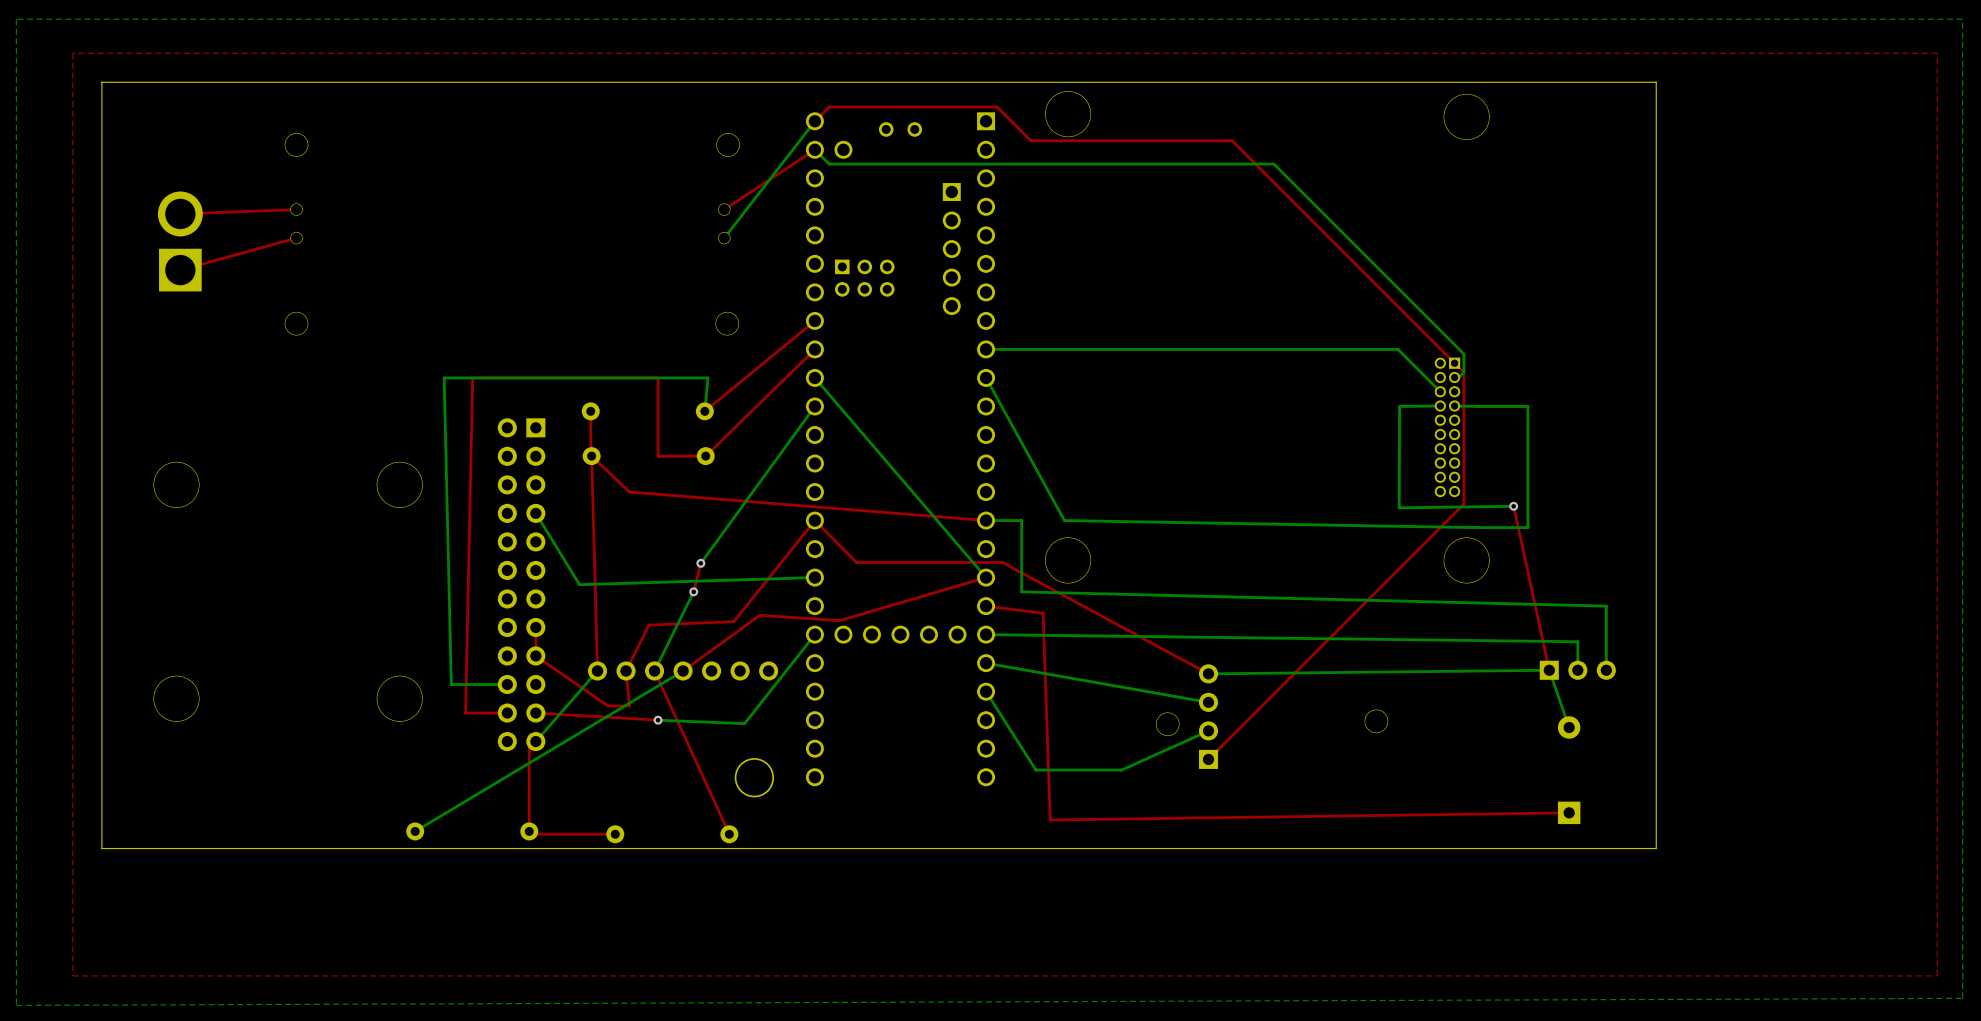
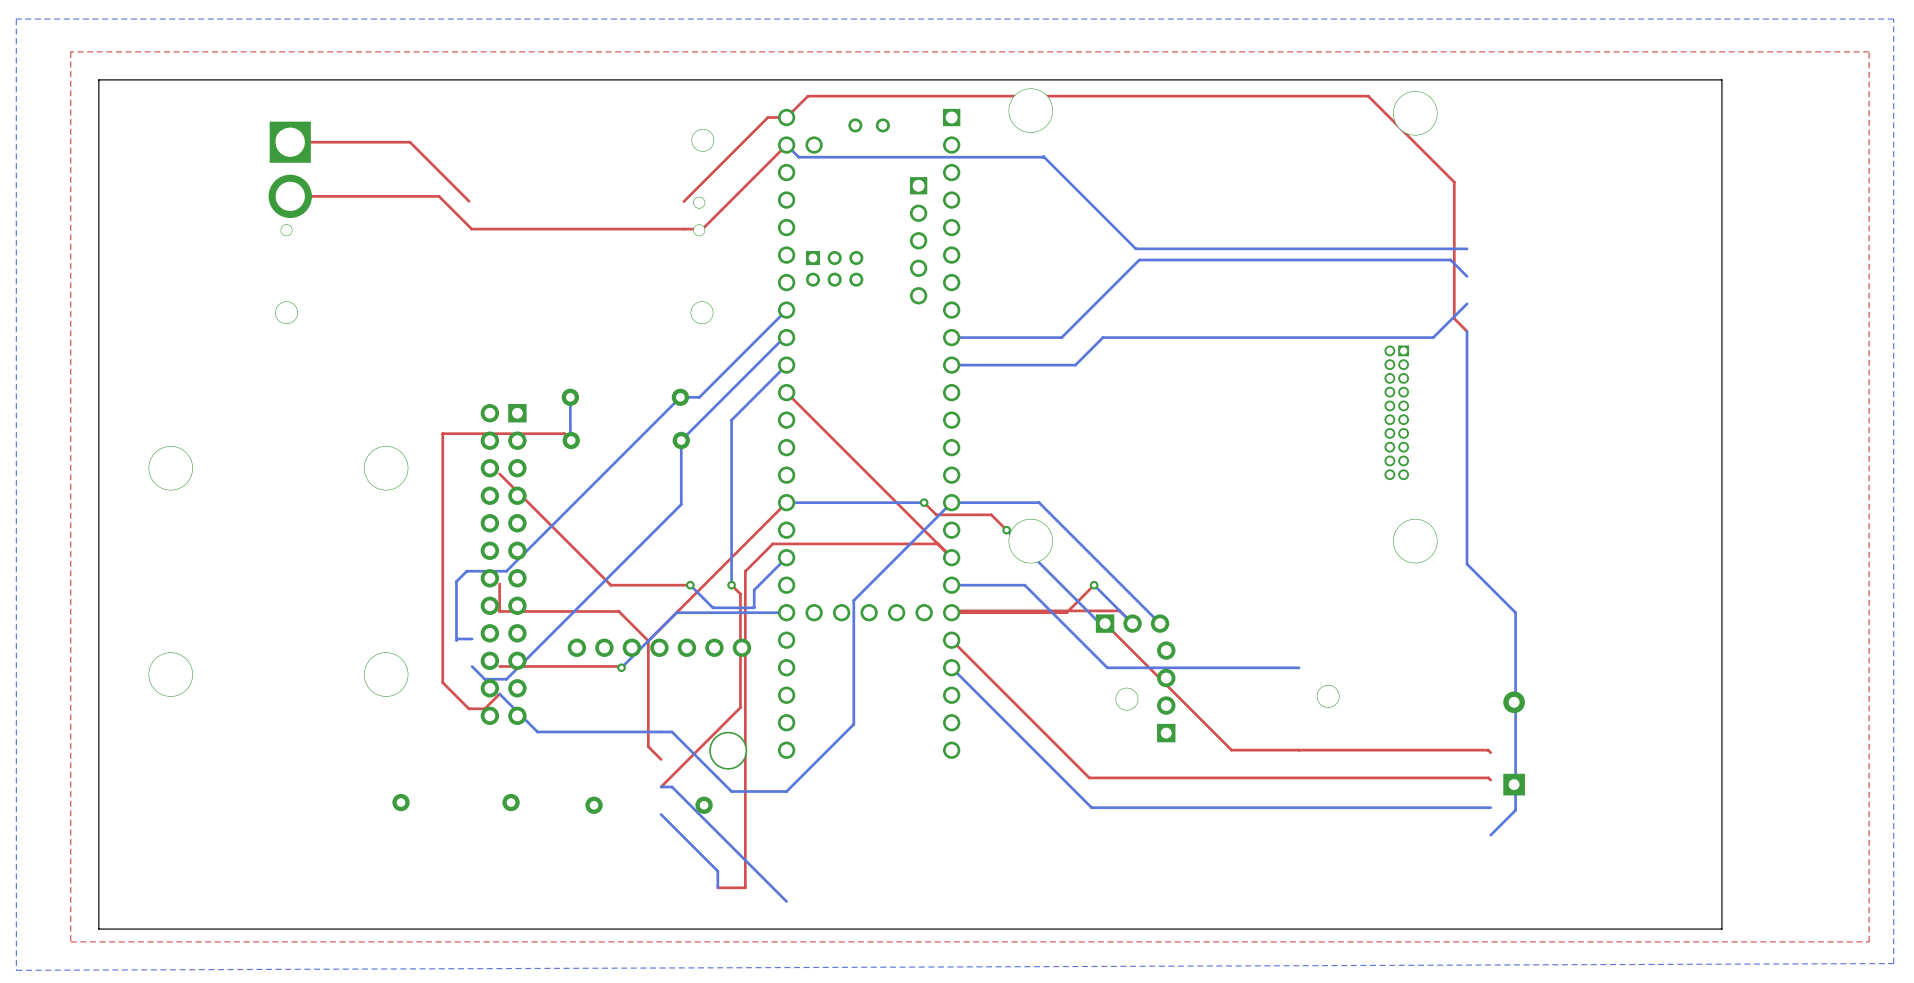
board edge: (1656, 82) (1656, 848) (101, 848) -> (1598, 79) (1721, 79) (1721, 929) (98, 929) (98, 819)
top track: (829, 107) (997, 107) (1030, 140) (1232, 140) (1463, 372) (1463, 504) (1208, 759) -> (800, 103) (807, 96) (1368, 96) (1454, 182) (1454, 318) (1467, 331)
top track: none -> (786, 117) (767, 117) (683, 201)
bottom track: (814, 121) (724, 238) -> none
top track: none -> (290, 142) (410, 142) (469, 201)
top track: (814, 149) (724, 209) -> (786, 145) (702, 229) (471, 229) (439, 196) (290, 196)
bottom track: (827, 162) (829, 164) (1273, 164) (1463, 353) (1463, 372) (1458, 377) (1454, 377) -> (798, 157) (1043, 156) (1135, 248) (1467, 248)
top track: (296, 209) (180, 213) -> none
top track: (296, 238) (180, 270) -> none
part rotation: 0° (180, 241) -> 180° (290, 169)
part position: (180, 241) -> (290, 169)
bottom track: none -> (1467, 276) (1450, 259) (1139, 259) (1061, 337)
top track: (814, 320) (704, 411) -> none
bottom track: none -> (786, 310) (699, 397) (680, 397) (506, 571) (466, 571) (456, 581) (456, 640) (472, 638)
bottom track: none -> (1467, 331) (1467, 564) (1515, 612) (1515, 810) (1490, 835)
top track: (814, 349) (705, 456) (658, 456) (658, 377) (472, 377) (465, 713) (507, 713) -> none
bottom track: none -> (786, 337) (784, 337) (681, 440) (681, 504) (506, 679) (484, 679) (472, 666)
bottom track: (1142, 349) (1100, 349) -> (1102, 337) (1075, 365) (951, 365)
bottom track: (1398, 349) (1440, 391) -> (1349, 337) (1433, 337) (1467, 303)
bottom track: (814, 377) (986, 577) -> (786, 365) (731, 420) (731, 585)
bottom track: (986, 377) (1064, 520) (1478, 527) -> none
bottom track: (1440, 405) (1399, 406) (1399, 507) (1513, 506) -> none
bottom track: (1454, 405) (1527, 406) (1527, 527) (1471, 527) -> none
bottom track: (814, 406) (700, 563) -> none
top track: (590, 411) (590, 455) -> (499, 694) (484, 708) (468, 708) (442, 682) (442, 433) (564, 433) (570, 439)
bottom track: none -> (570, 397) (571, 440)
bottom track: (704, 411) (707, 377) (444, 377) (451, 684) (507, 684) -> none
top track: none -> (499, 473) (610, 585) (690, 585)
top track: (1513, 506) (1549, 670) -> none
via: (1513, 506) -> none
bottom track: (535, 513) (579, 584) (814, 577) -> (690, 585) (712, 607) (754, 607) (754, 590) (786, 557)
top track: none -> (786, 502) (648, 640)
top track: none -> (924, 502) (936, 514) (991, 514) (1006, 530)
bottom track: none -> (924, 502) (786, 502)
via: none -> (924, 502)
top track: (986, 520) (629, 492) (591, 456) (597, 670) -> none
bottom track: none -> (951, 502) (853, 600) (853, 724) (786, 791) (731, 791) (672, 731) (537, 731) (499, 694)
bottom track: (1021, 520) (1021, 591) (1606, 606) (1606, 670) -> (986, 502) (1039, 502) (1160, 623)
bottom track: none -> (1006, 530) (1100, 623) (1105, 623)
via: none -> (1006, 530)
top track: (700, 563) (693, 591) -> none
via: (700, 563) -> none
top track: none -> (937, 543) (772, 543) (745, 571) (745, 887) (717, 887)
top track: (986, 577) (839, 620) (759, 615) (683, 670) -> (951, 557) (786, 392)
bottom track: (693, 591) (654, 670) -> none
via: (693, 591) -> none
top track: none -> (499, 583) (499, 611) (618, 611) (648, 640)
via: none -> (690, 585)
top track: none -> (731, 585) (740, 594) (740, 707) (661, 786)
via: none -> (731, 585)
top track: (986, 606) (1043, 613) (1050, 820) (1569, 812) -> none
bottom track: none -> (951, 585) (1024, 585) (1107, 667) (1299, 667)
top track: none -> (1094, 585) (1066, 612) (951, 612) (953, 610) (1119, 610) (1132, 623)
bottom track: none -> (1094, 585) (1132, 623)
via: none -> (1094, 585)
top track: (535, 627) (535, 655) (608, 705) (629, 705) (626, 670) (648, 625) (733, 621) (814, 520) (856, 562) (1002, 562) (1208, 673) -> none
bottom track: (814, 634) (744, 723) (658, 720) -> (786, 612) (676, 612) (621, 667)
bottom track: (986, 634) (1577, 641) (1577, 670) -> none
top track: none -> (1105, 623) (1231, 750) (1488, 750) (1490, 752)
part: none -> (1132, 623)
top track: none -> (648, 640) (648, 746) (661, 759)
top track: none -> (951, 640) (1089, 777) (1488, 777) (1490, 780)
bottom track: (986, 663) (1208, 702) -> none
bottom track: (597, 670) (535, 741) -> none
top track: (654, 670) (729, 834) -> none
bottom track: (683, 670) (415, 831) -> none
part: (1577, 670) -> none
bottom track: (1208, 673) (1549, 670) (1569, 727) -> none
top track: none -> (499, 666) (621, 667)
bottom track: (986, 691) (1035, 770) (1121, 770) (1208, 730) -> (951, 667) (1091, 807) (1490, 807)
top track: (535, 713) (658, 720) -> none
via position: (658, 720) -> (621, 667)
top track: (535, 741) (529, 748) (529, 831) (532, 834) (615, 834) -> none
bottom track: none -> (661, 786) (672, 786) (786, 901)
bottom track: none -> (661, 814) (717, 871) (717, 887)

